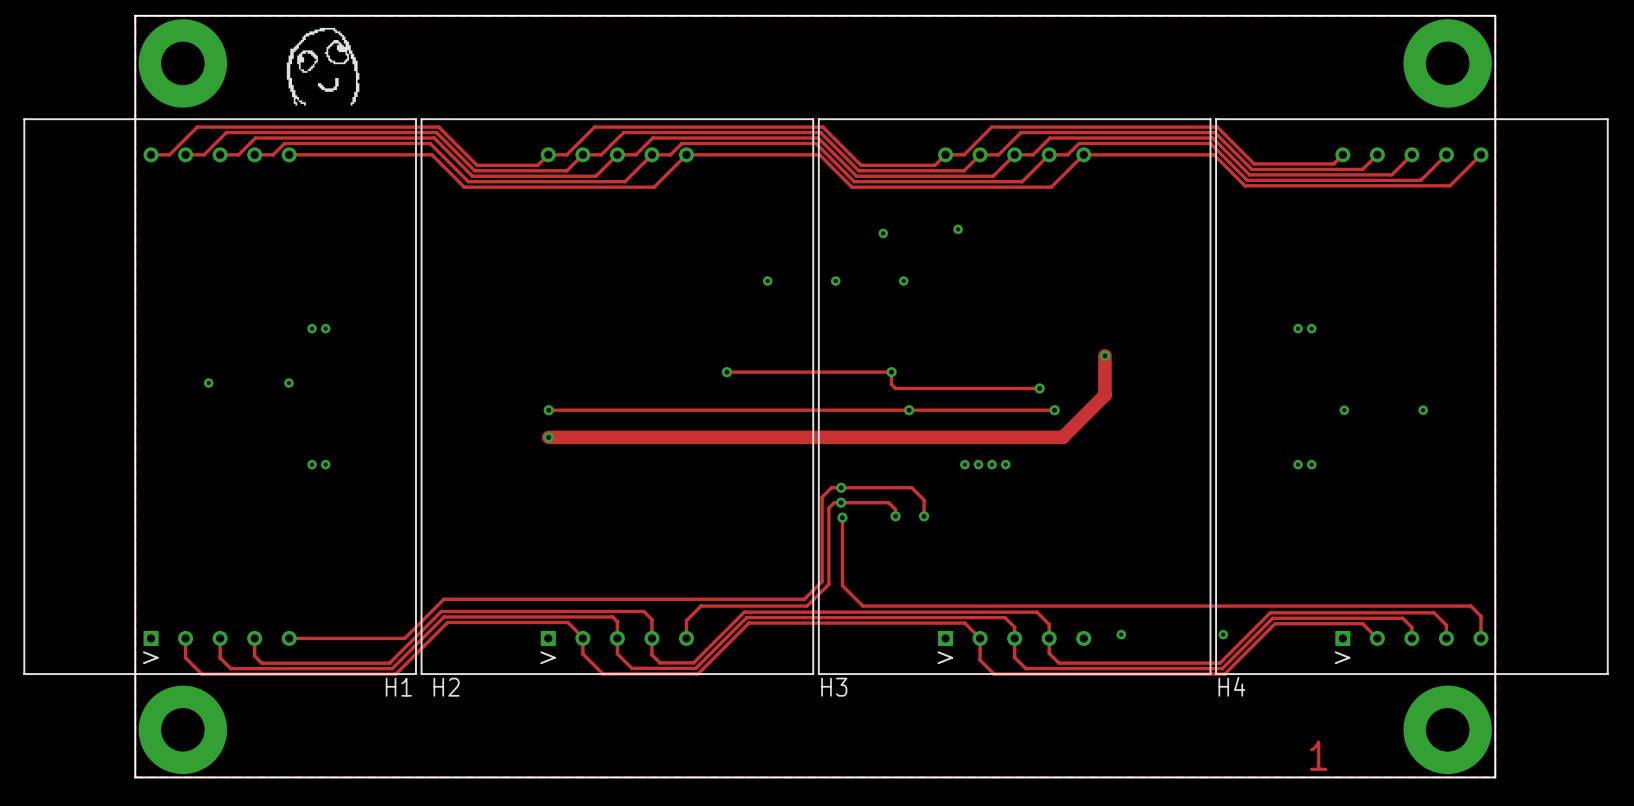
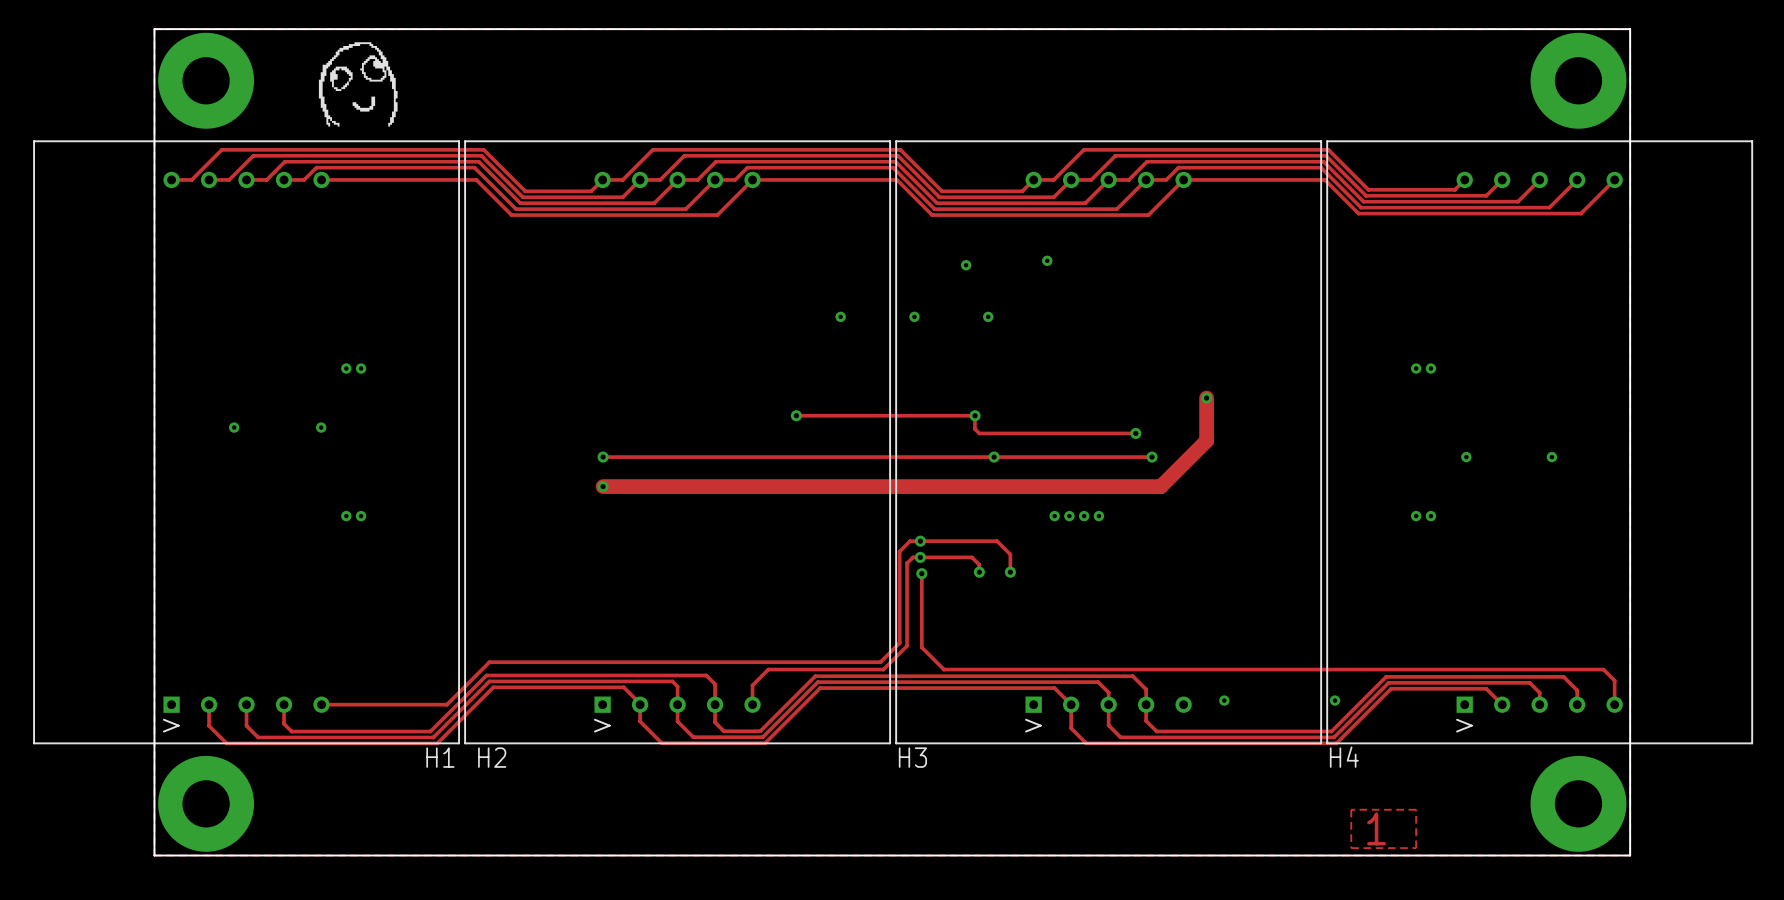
zone outline: none -> (1351, 809) (1416, 809) (1416, 848) (1351, 848) (1351, 809)
text position: 1 (1318, 755) -> 1 (1376, 828)

